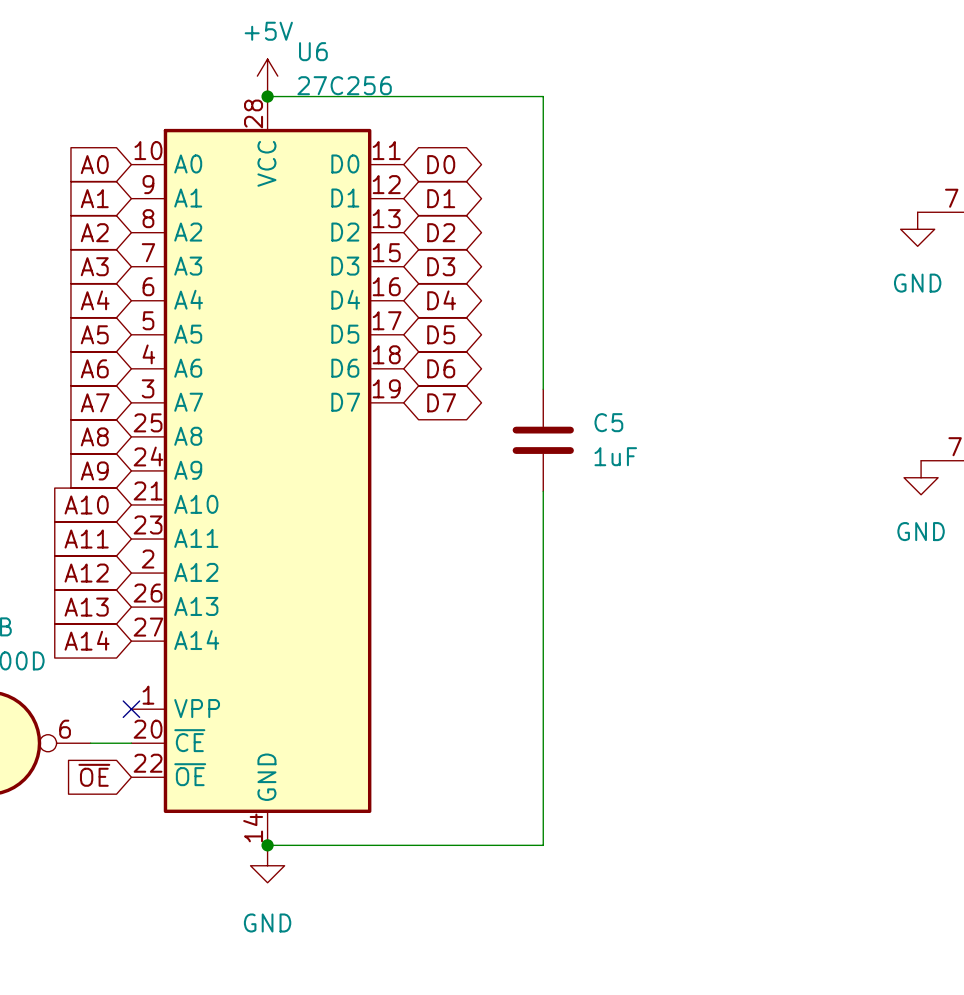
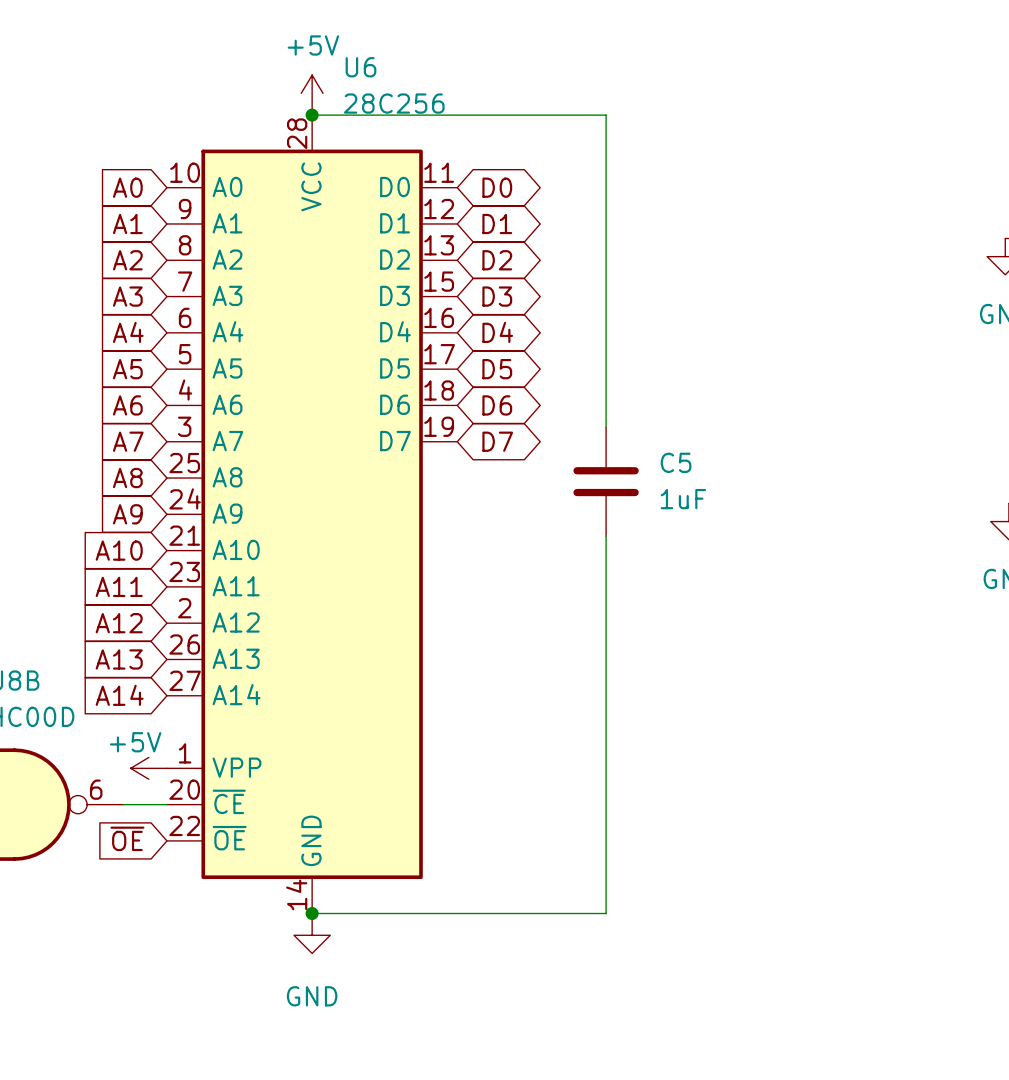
U6 value: 27C256 (344, 85) -> 28C256 (394, 103)
power symbol: none -> +5V (148, 768)
no-connect mark: (131, 709) -> none

